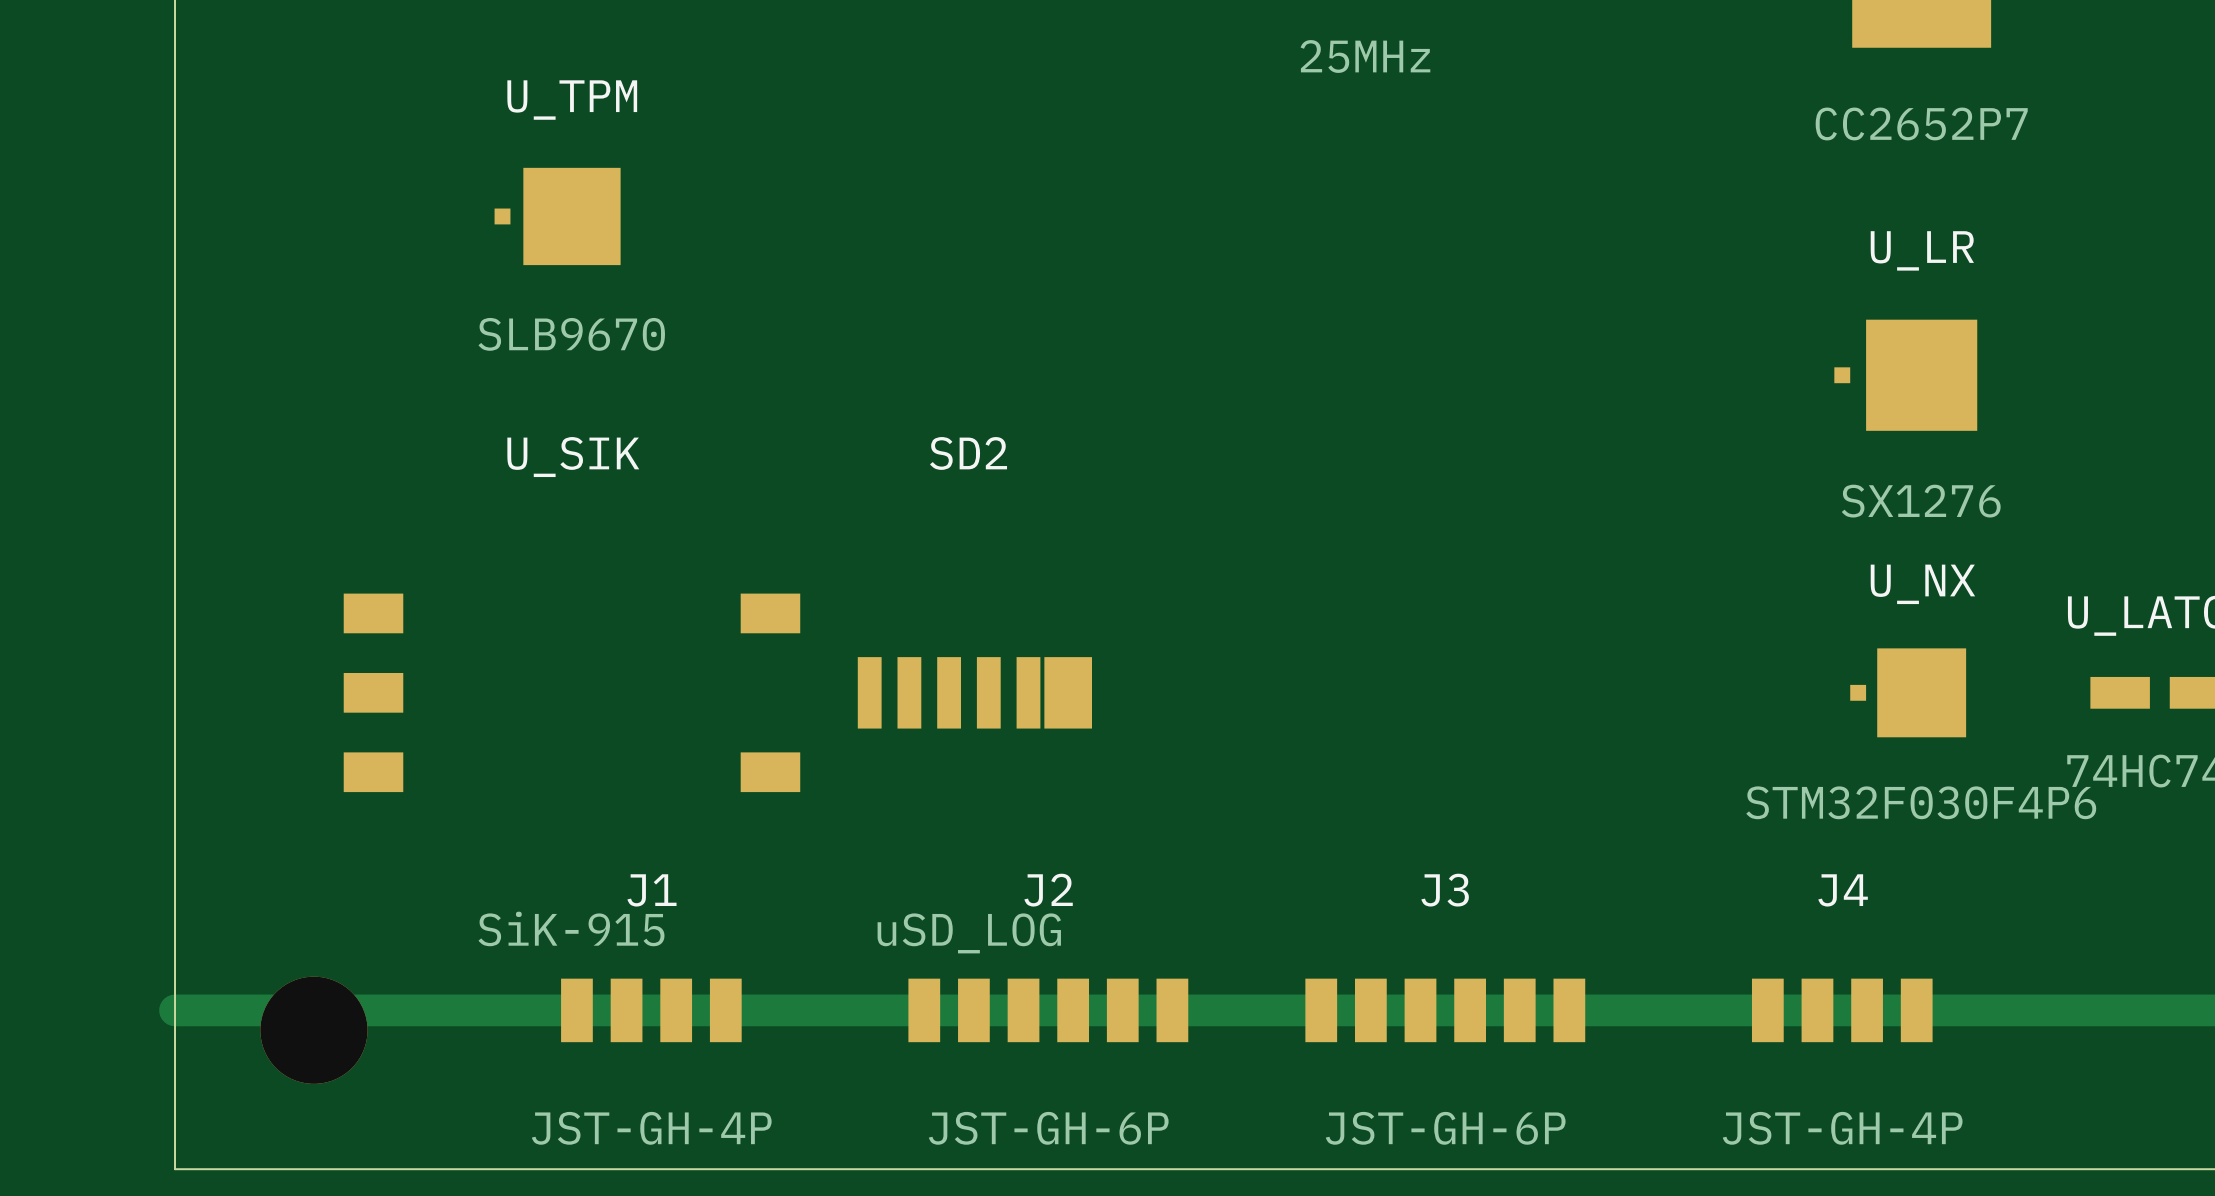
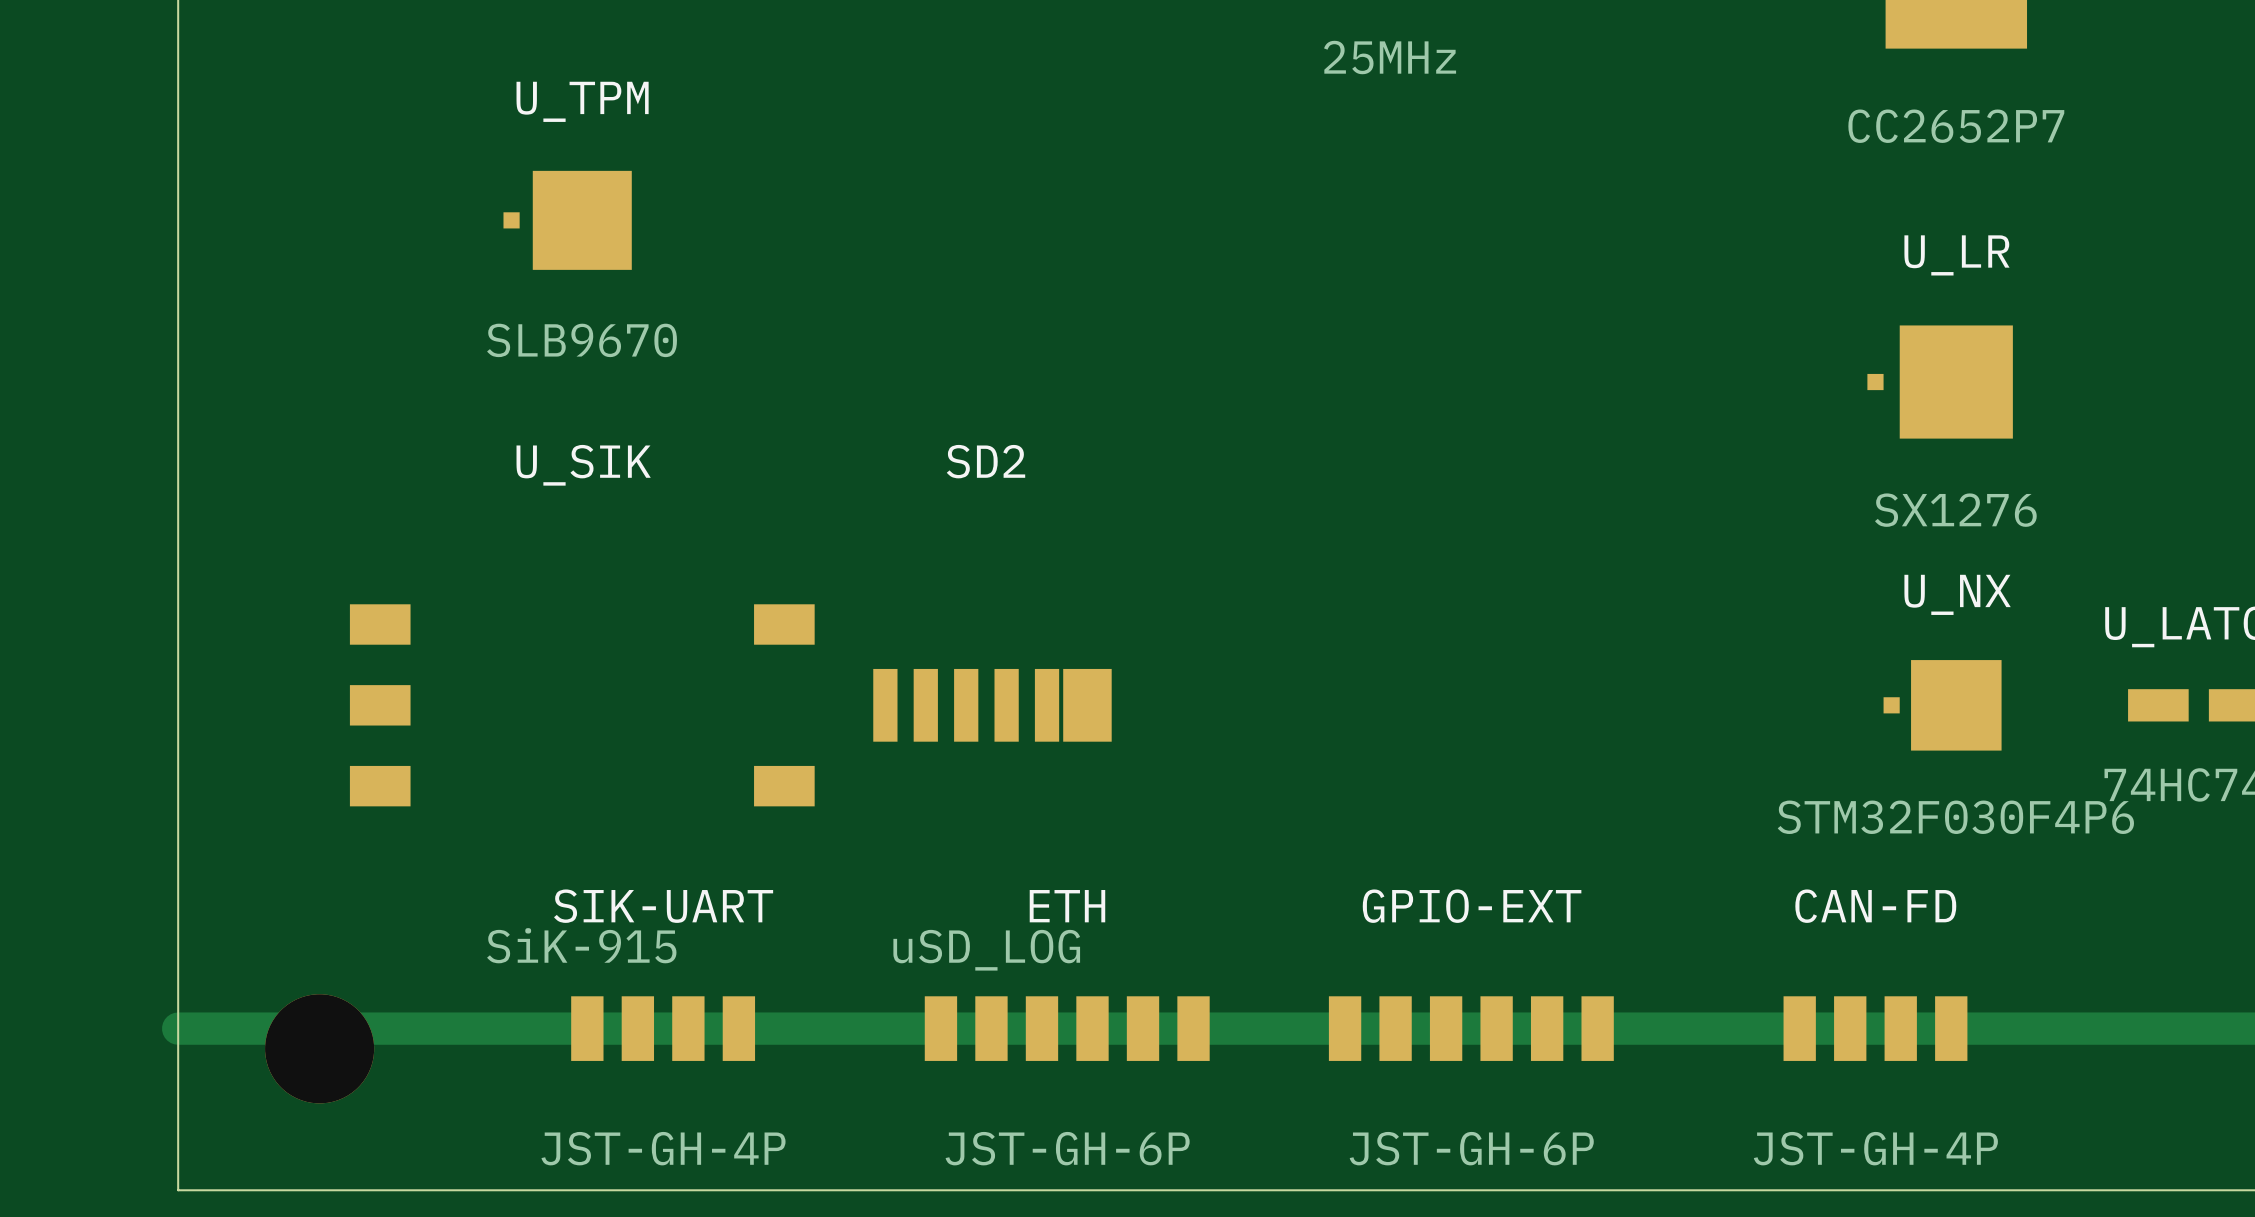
J1 name: J1 (651, 890) -> SIK-UART (663, 906)
J2 name: J2 (1048, 890) -> ETH (1067, 906)
J3 name: J3 (1445, 890) -> GPIO-EXT (1472, 906)
J4 name: J4 (1843, 890) -> CAN-FD (1875, 906)

